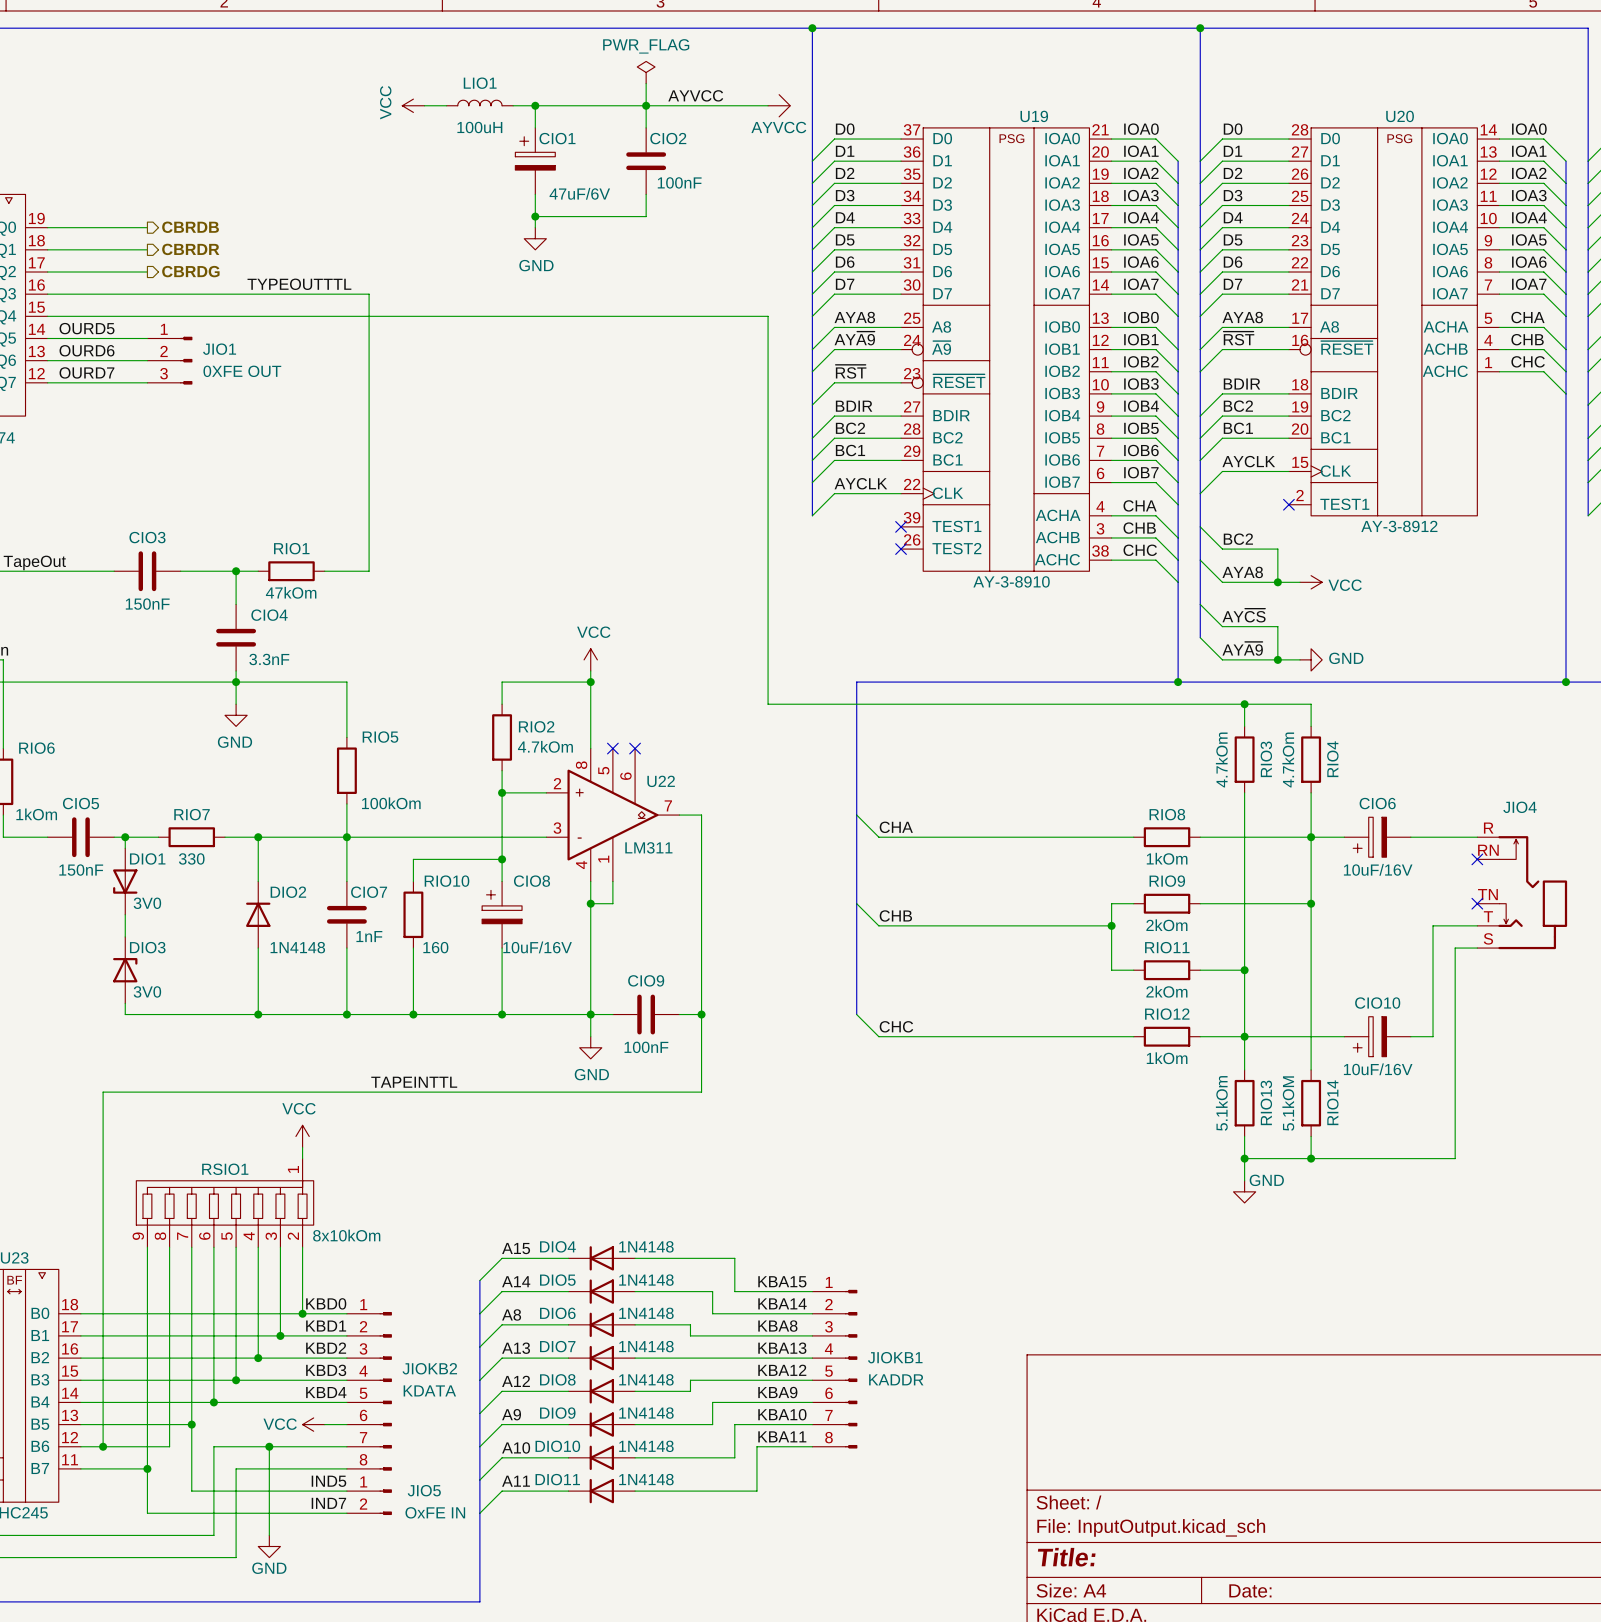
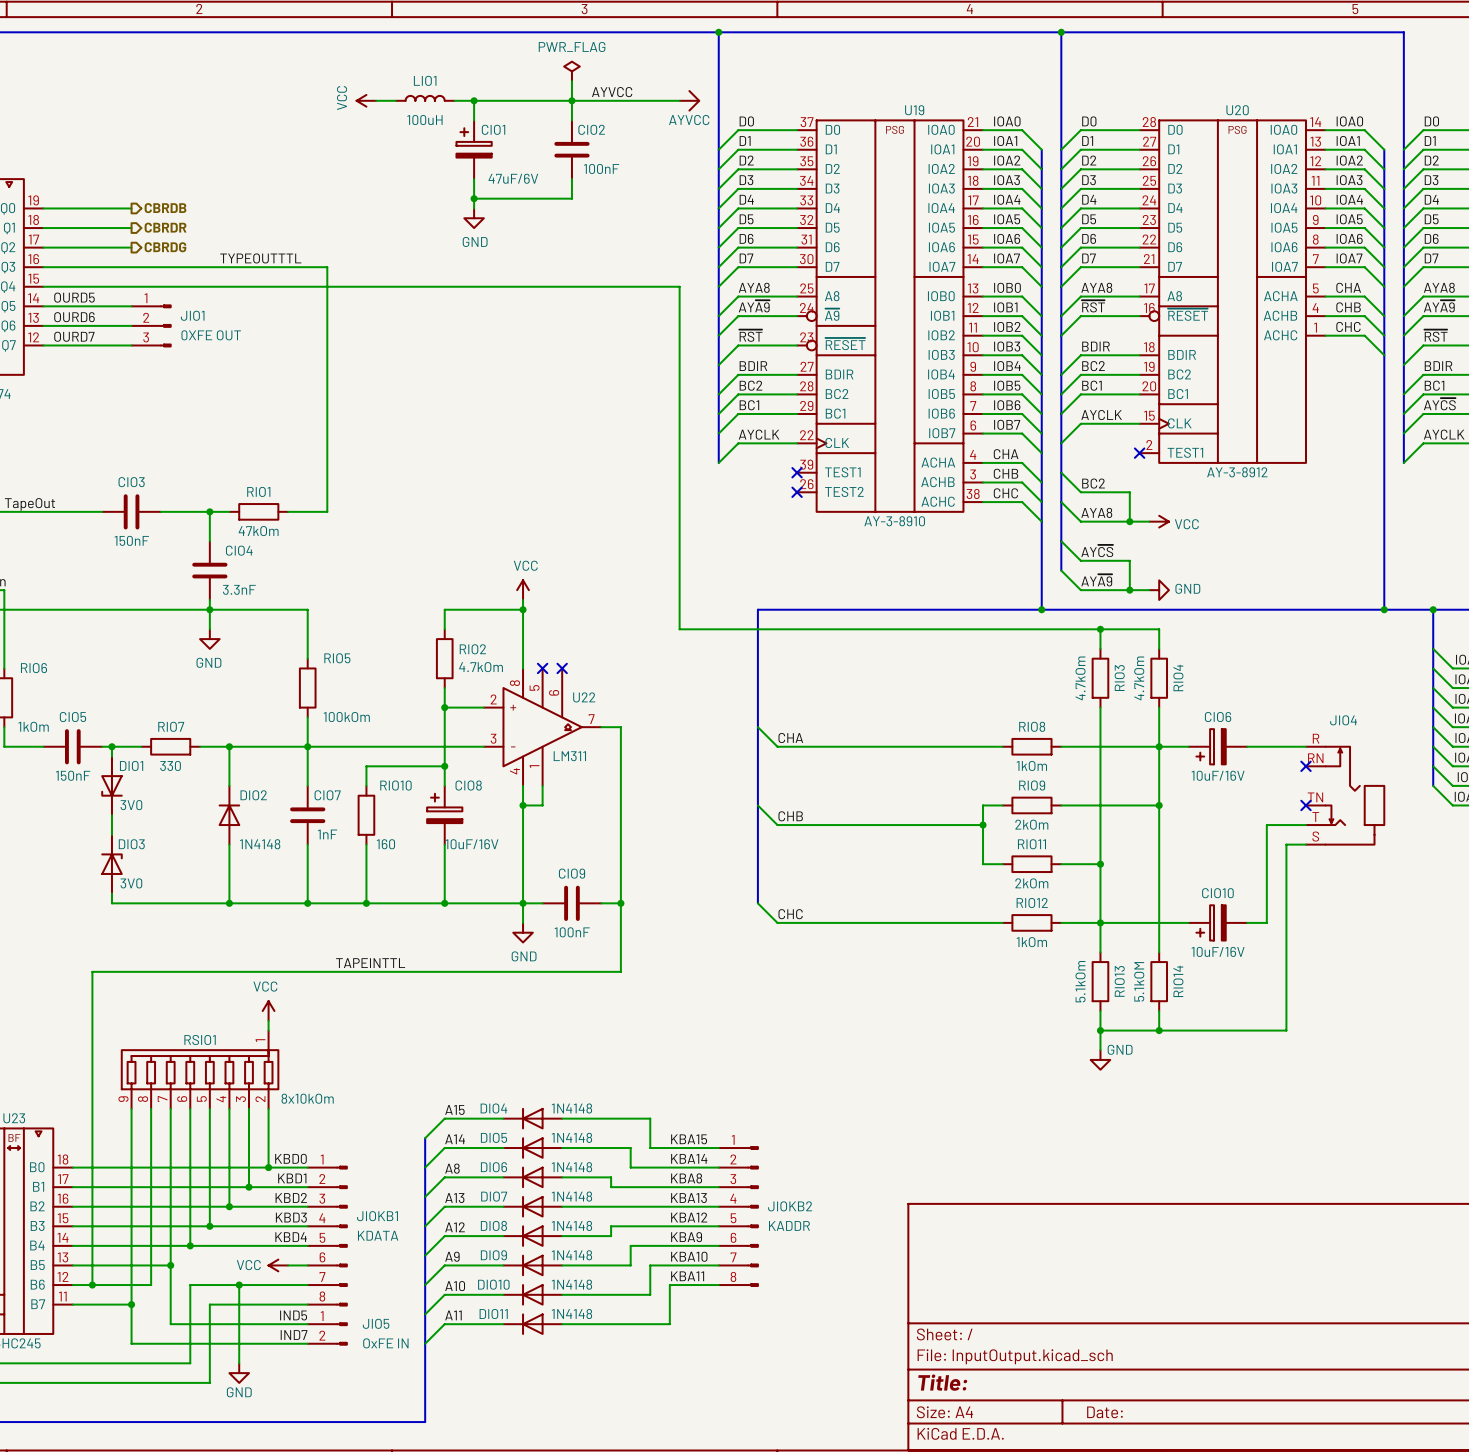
JIOKB1 name: JIOKB1 (895, 1357) -> JIOKB2 (790, 1206)
JIOKB2 name: JIOKB2 (429, 1368) -> JIOKB1 (377, 1216)

